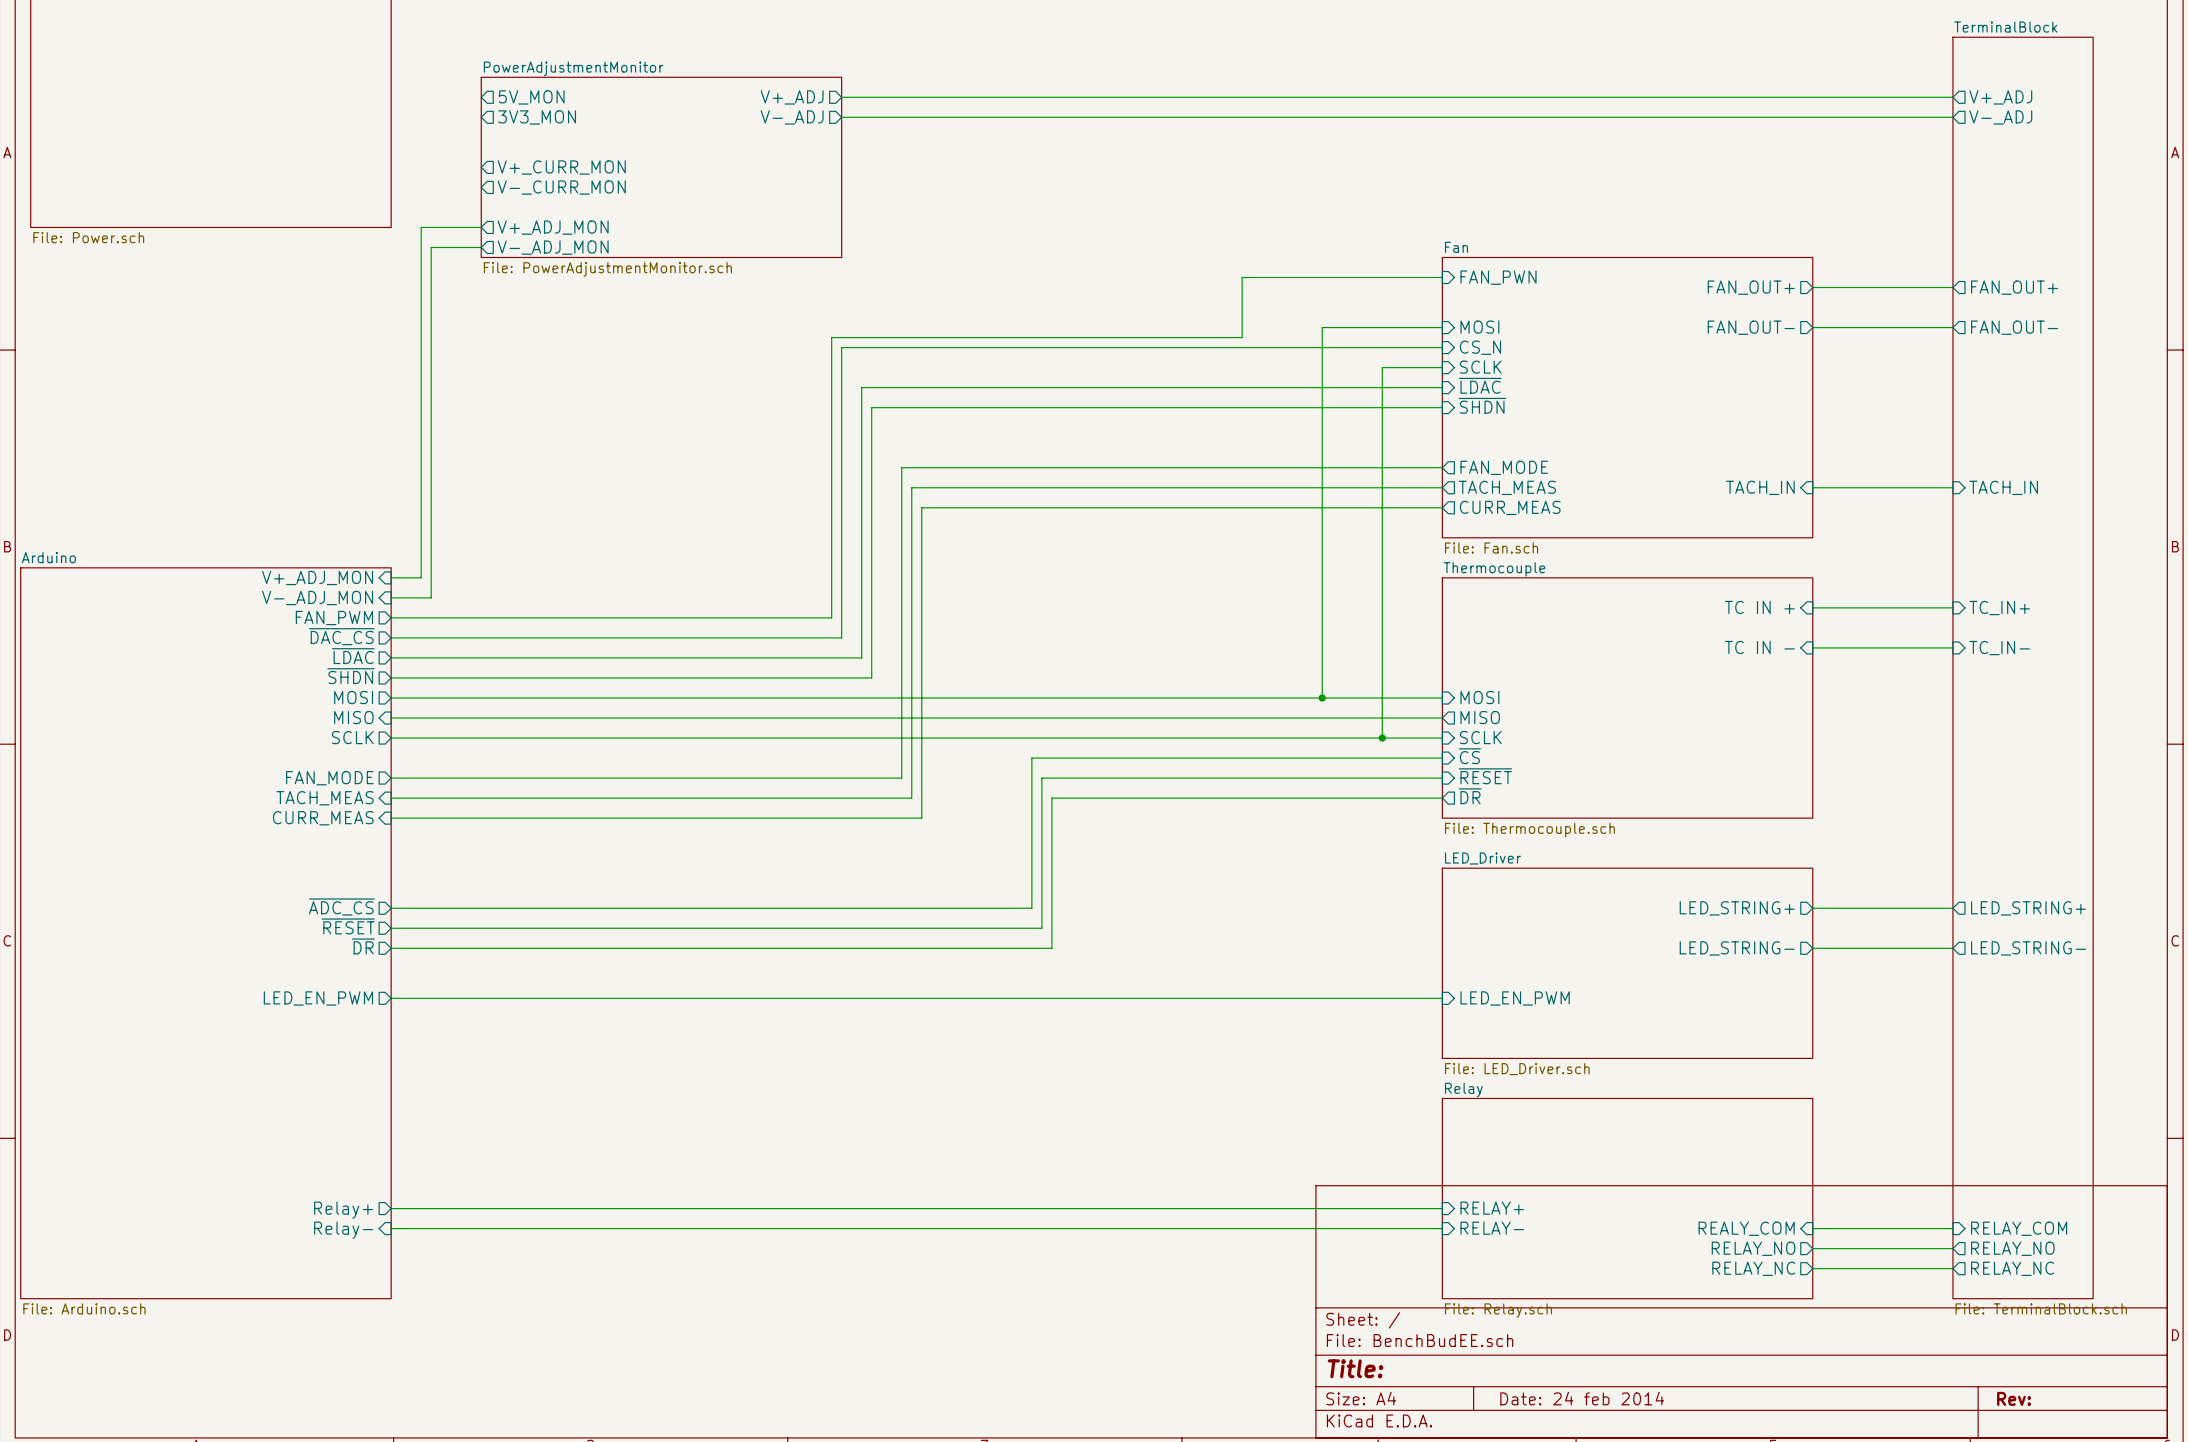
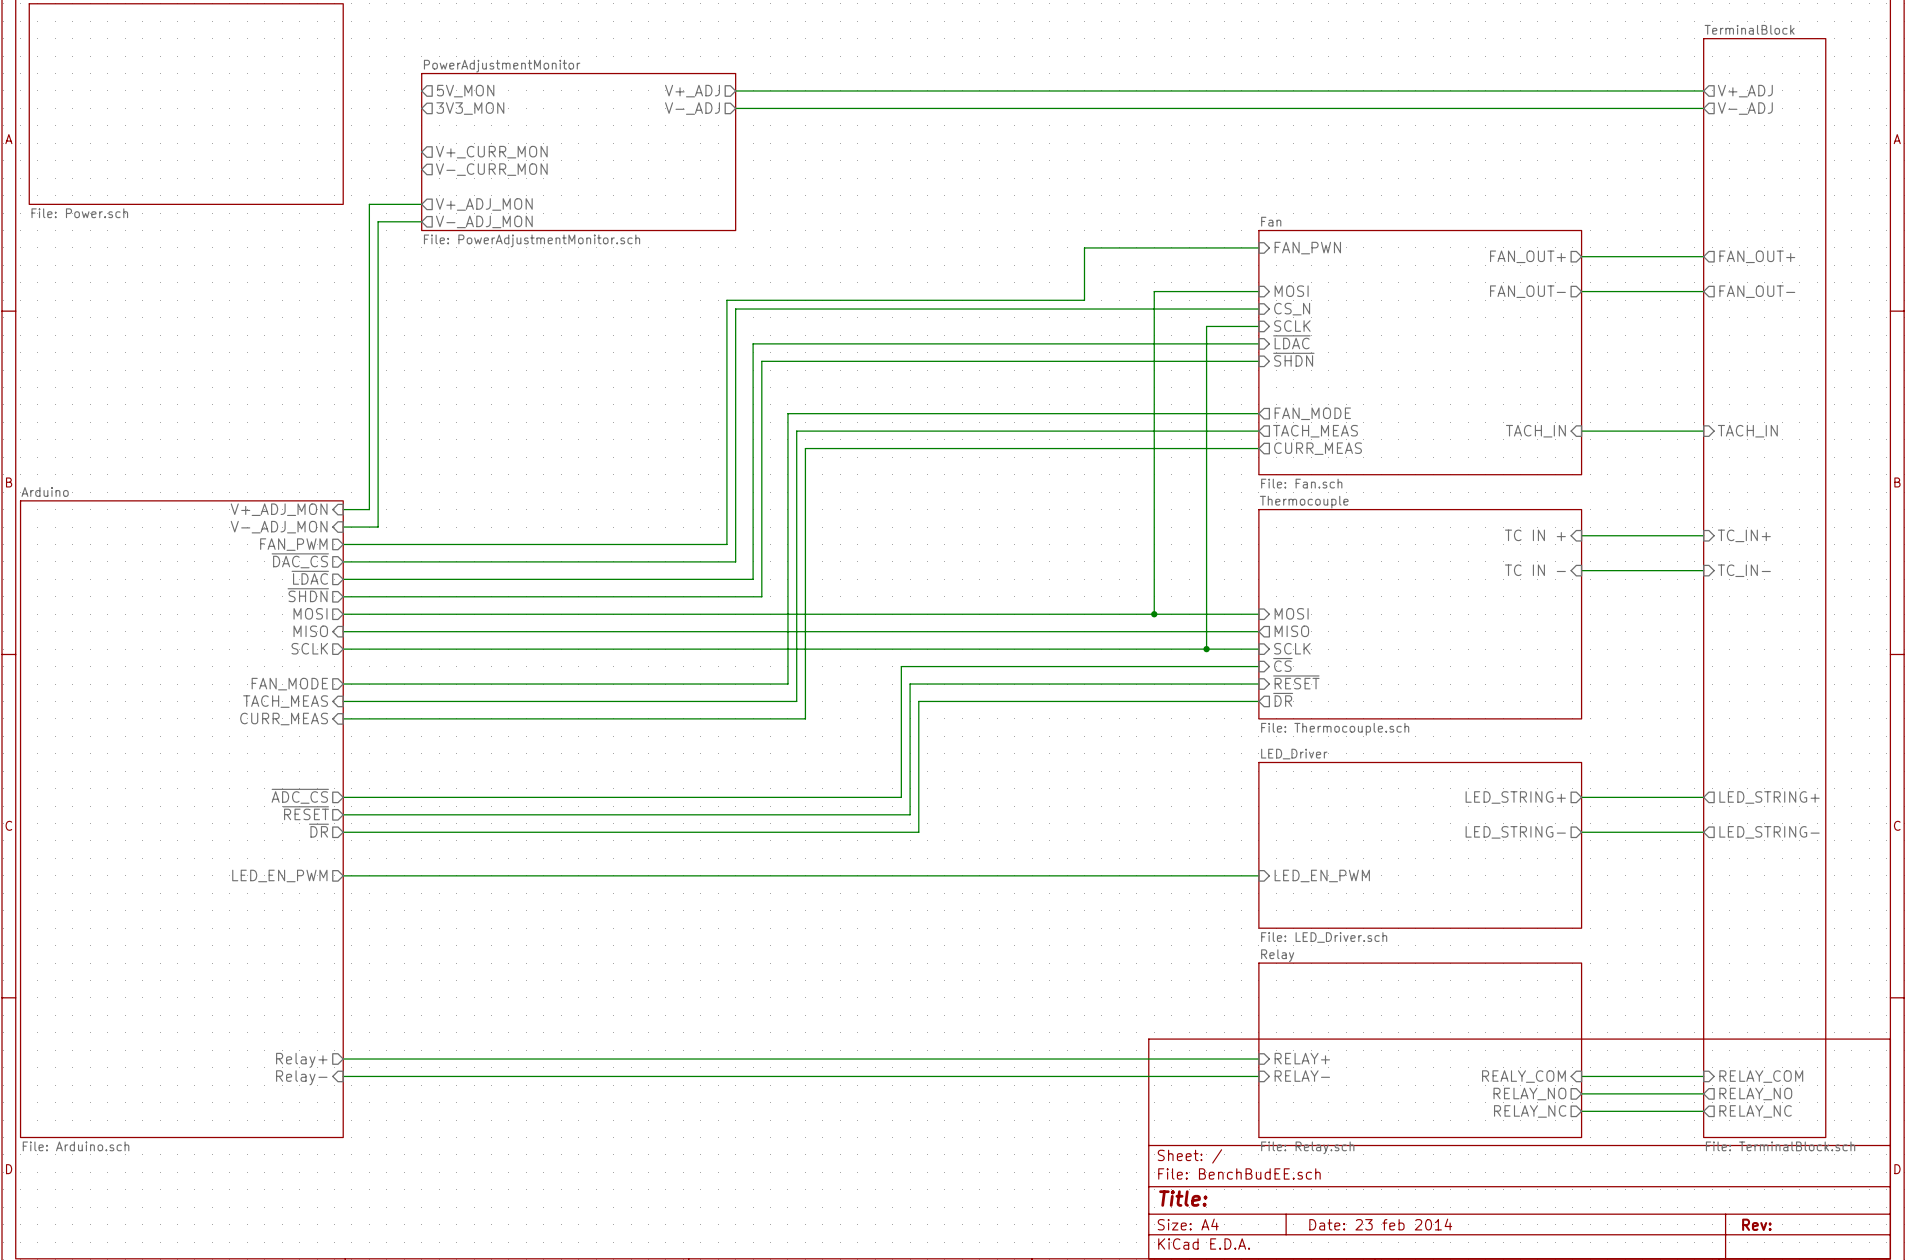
title block: Date: 24 feb 2014 (1582, 1398) -> Date: 23 feb 2014 (1380, 1224)

